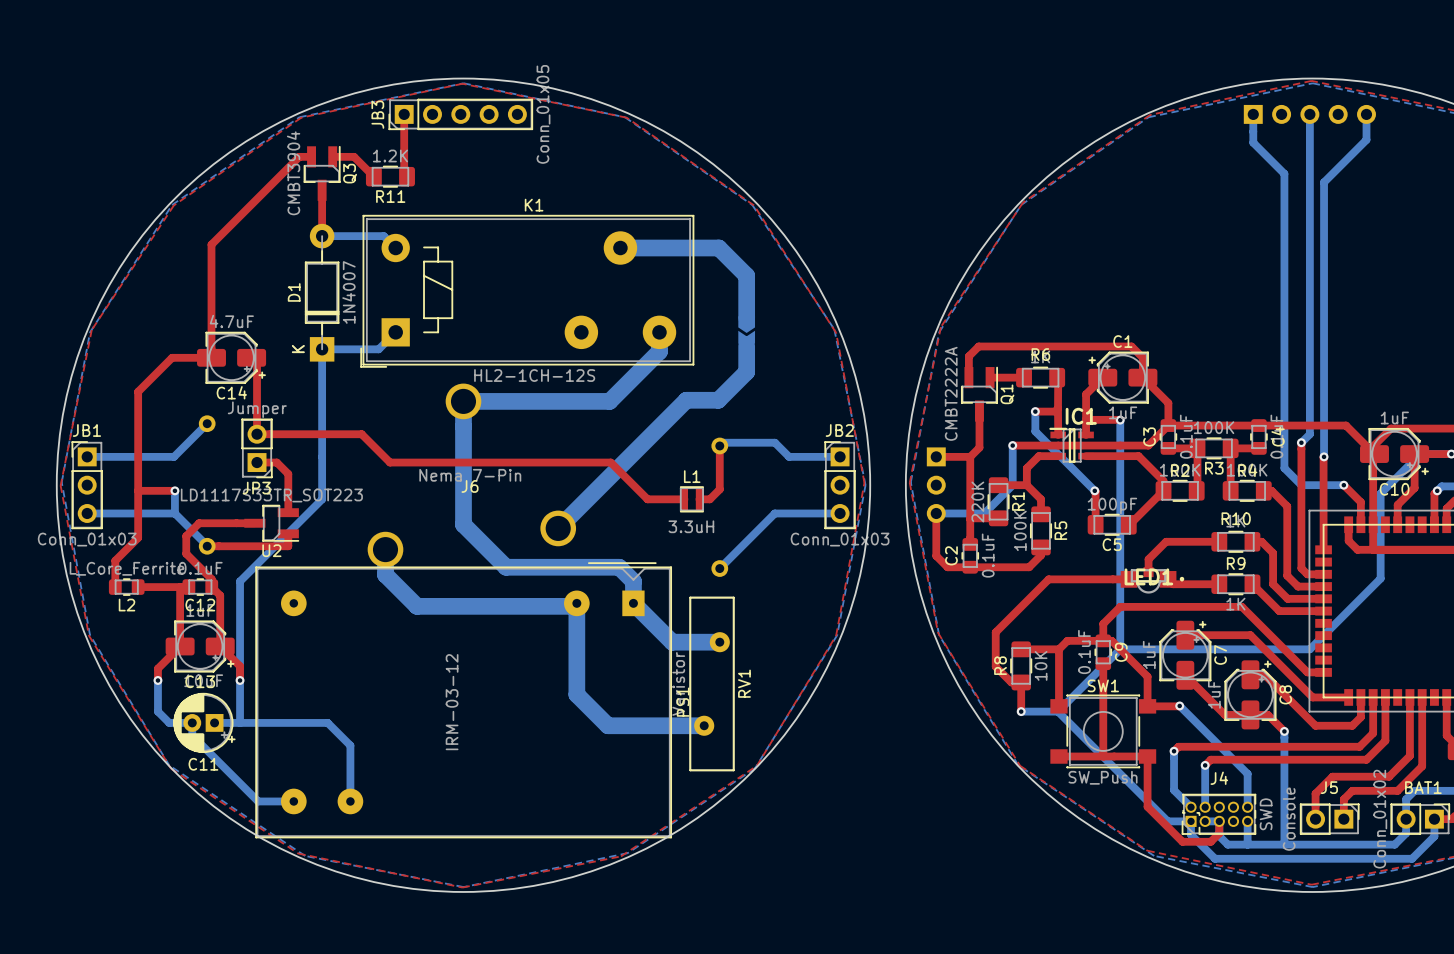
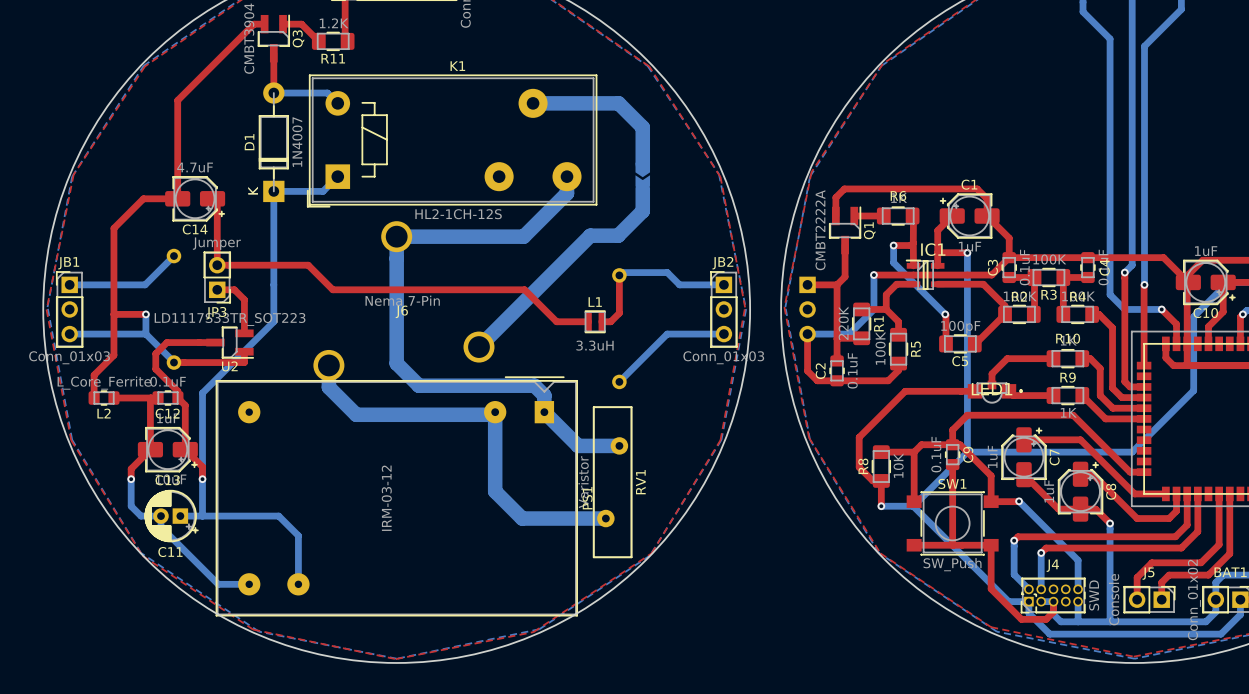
bottom track: (463, 524) (506, 567) (619, 567) (633, 581) (633, 584) -> (396, 343) (396, 363) (418, 385) (534, 385) (544, 395)

